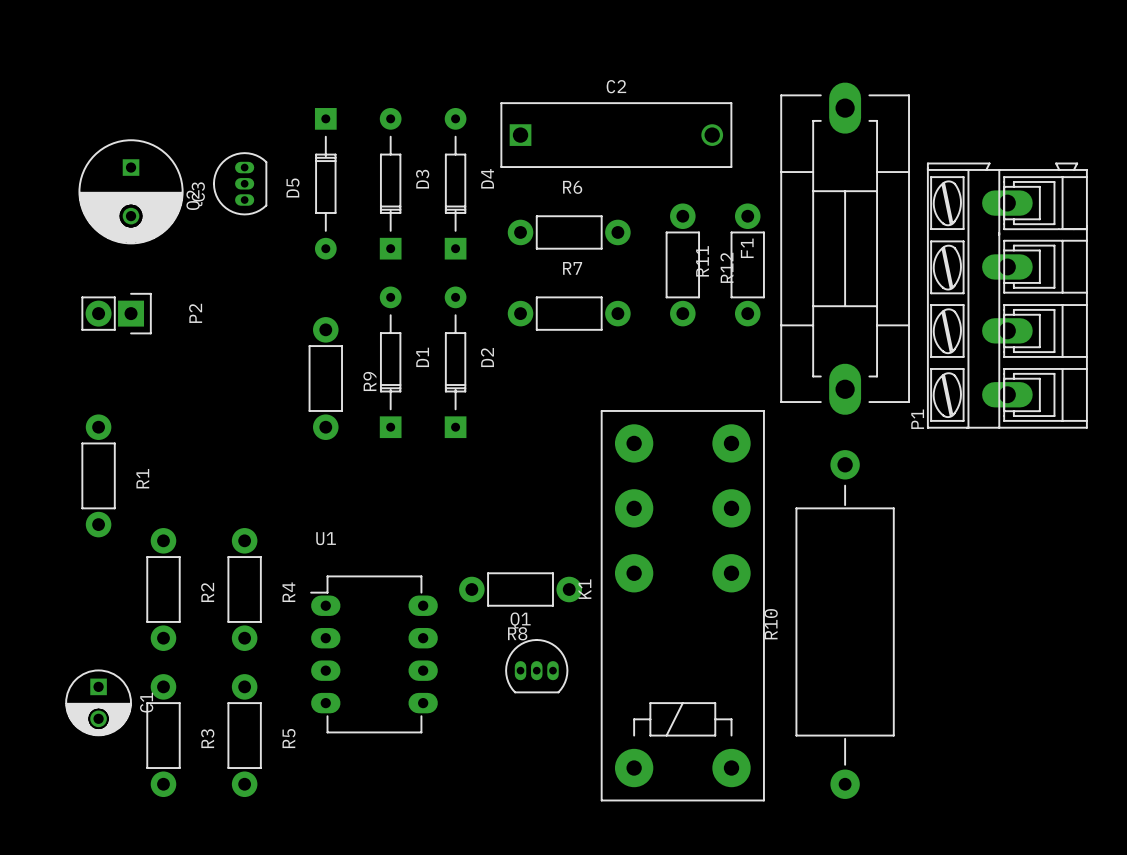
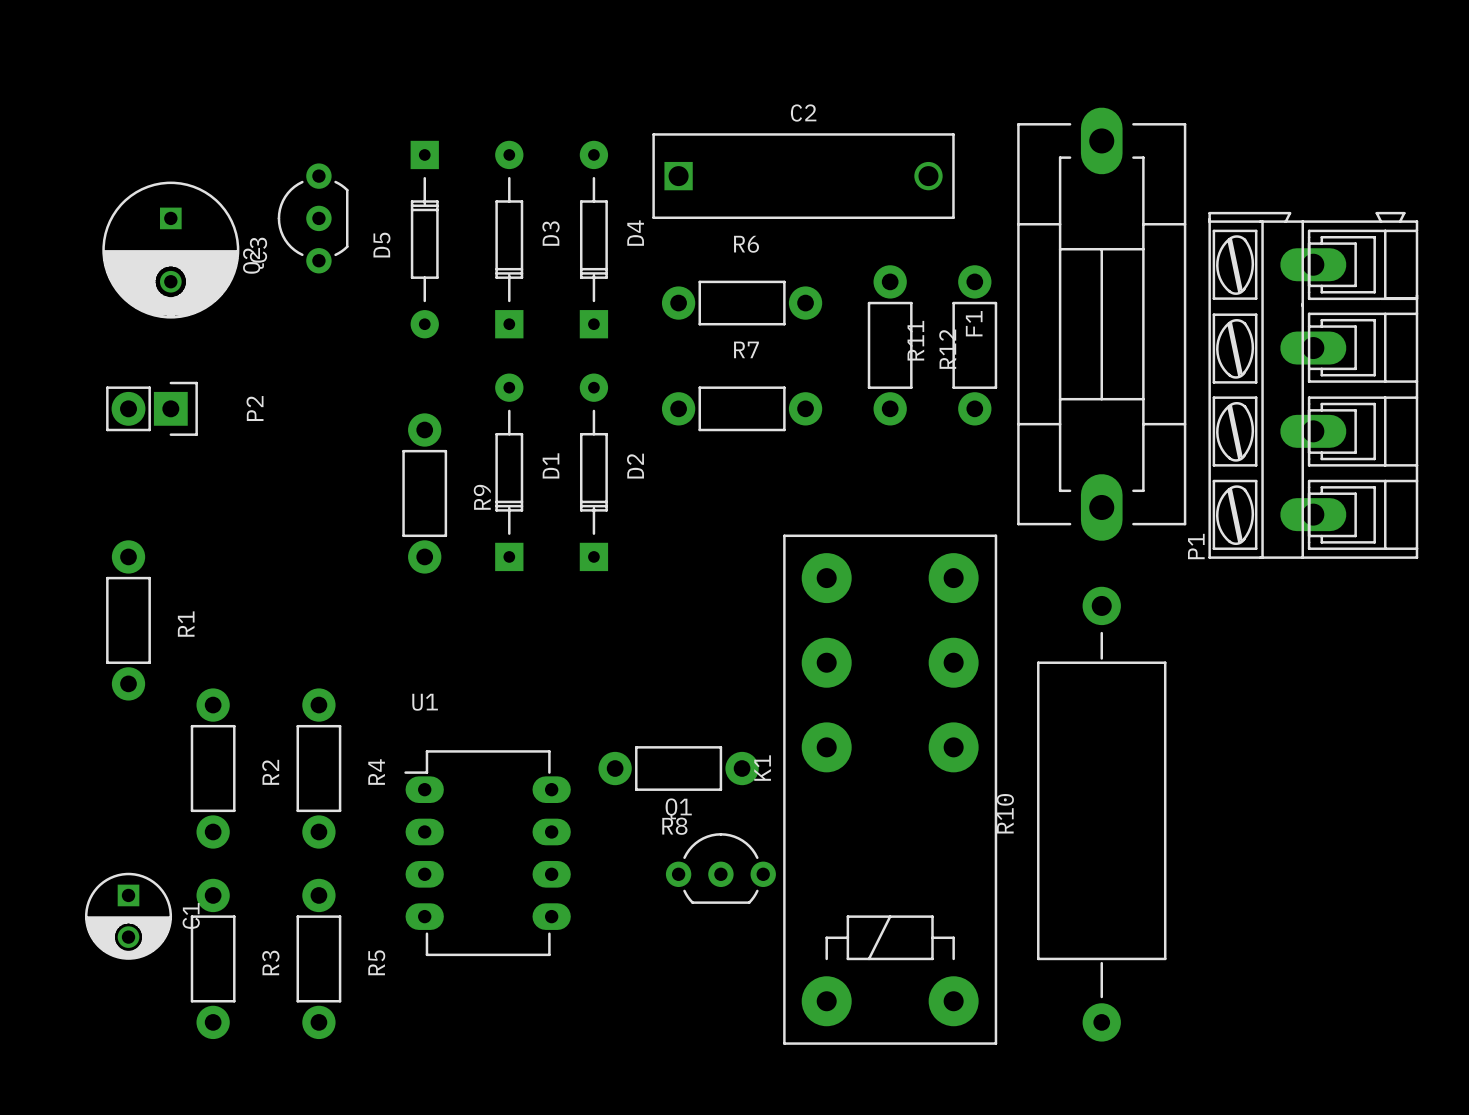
Q2 footprint: [213, 152, 268, 216] -> [277, 163, 349, 274]
Q1 footprint: [505, 639, 569, 694] -> [665, 833, 776, 904]

